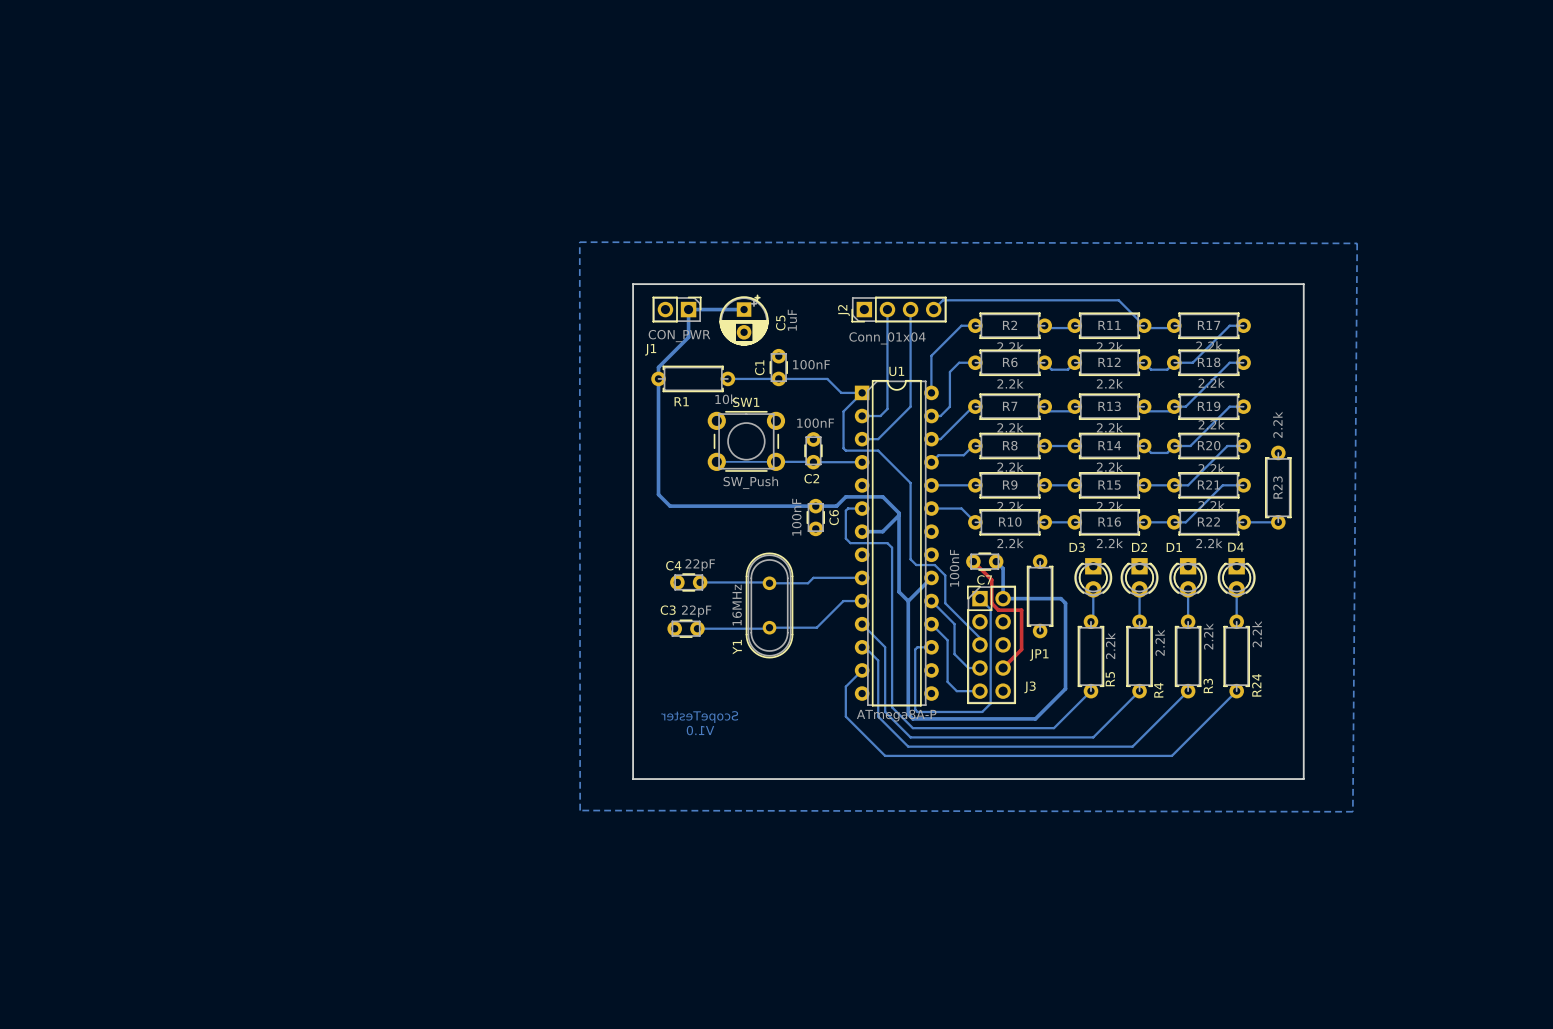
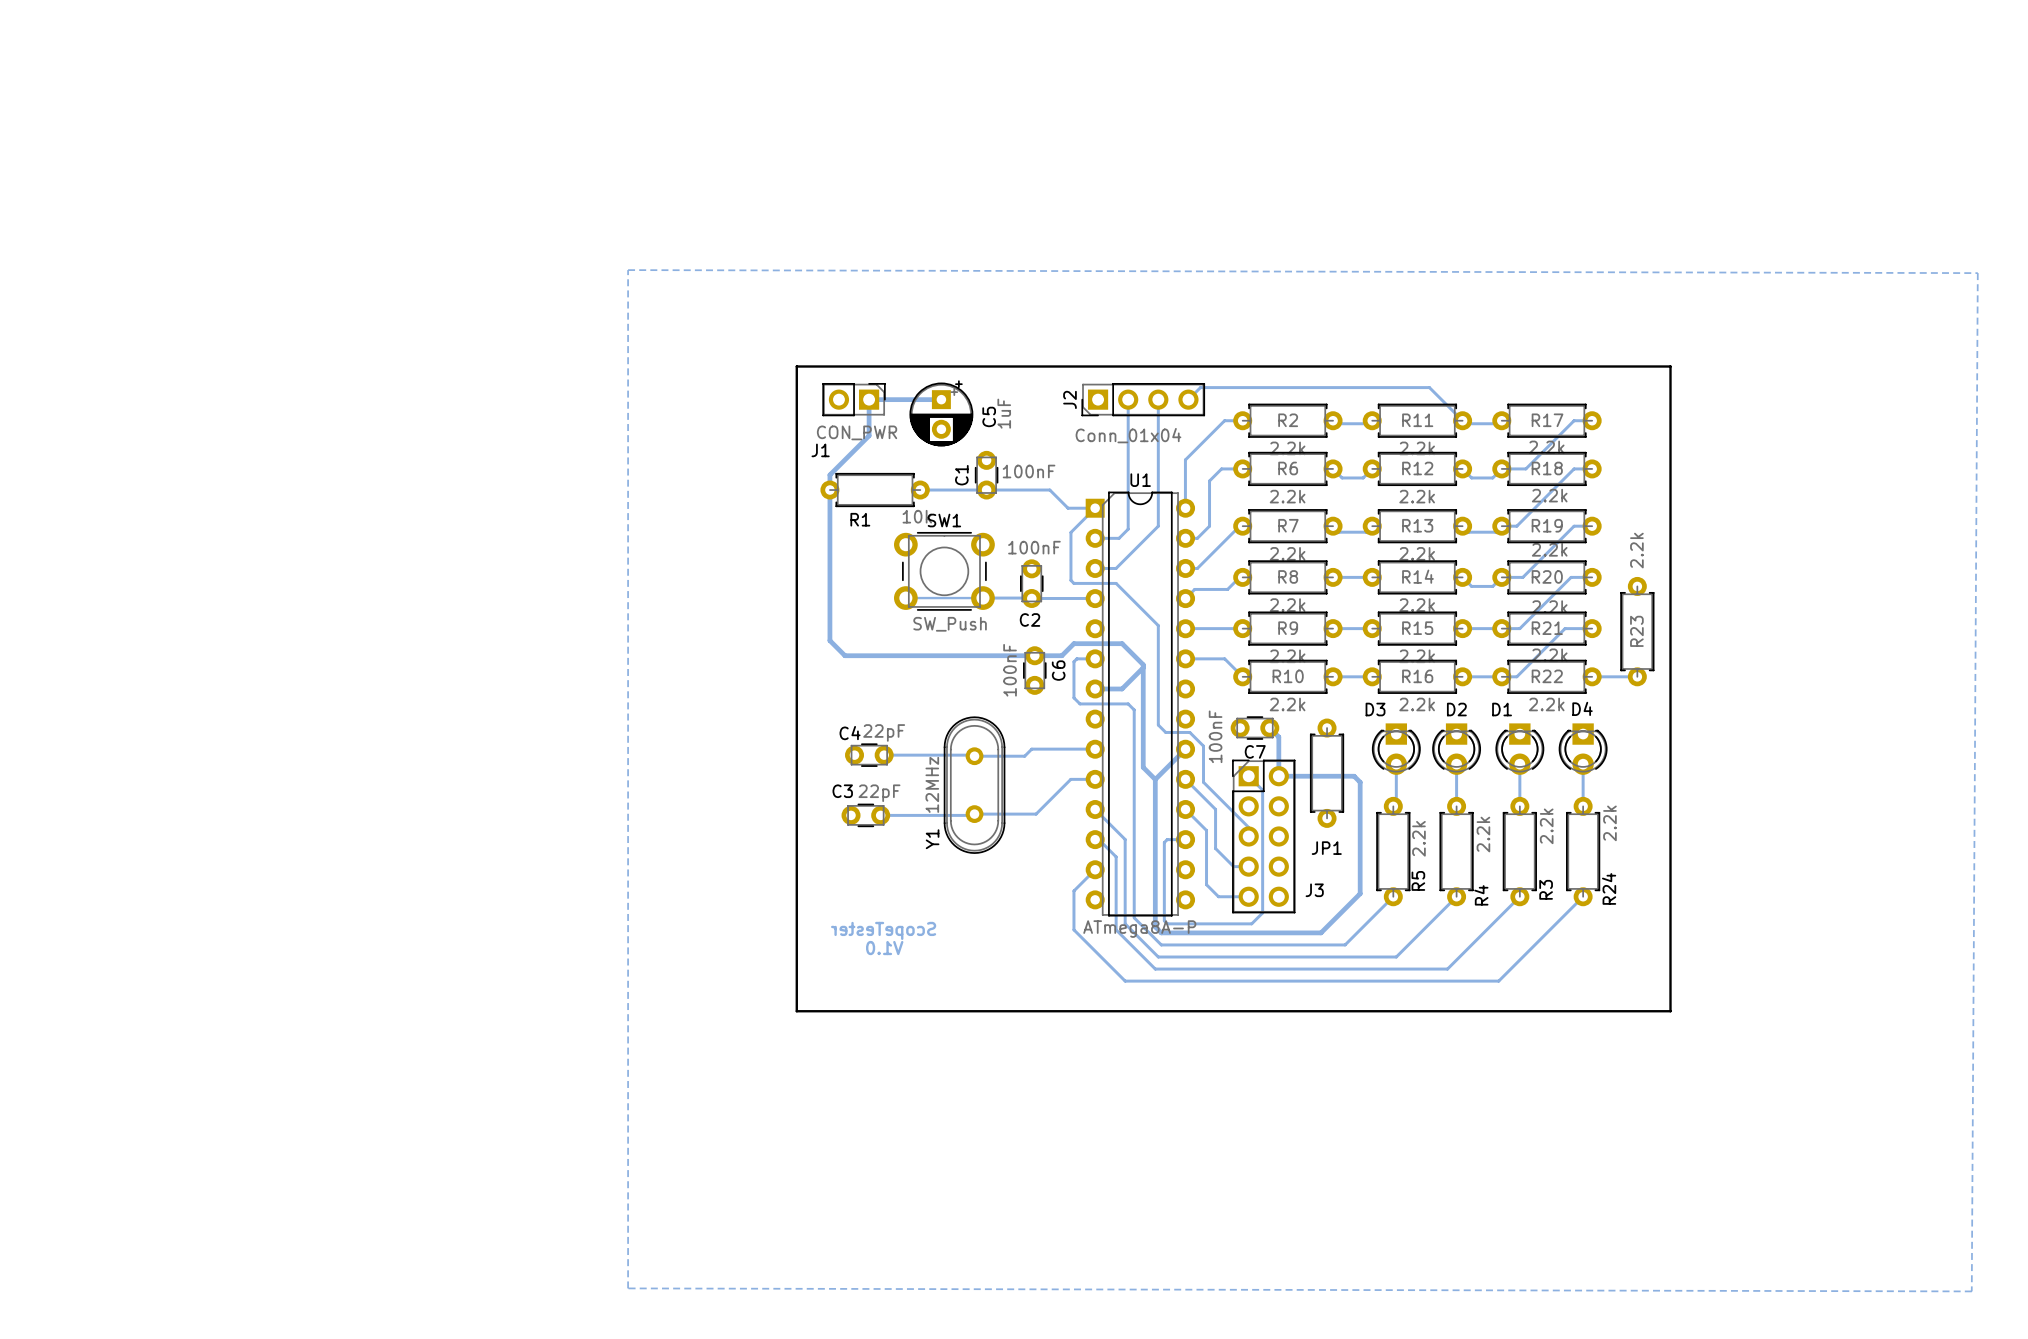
bottom zone outline: (579, 242) (580, 810) (1352, 811) (1357, 243) (579, 242) -> (628, 270) (628, 1288) (1971, 1291) (1977, 273) (628, 270)
top track: (973, 561) (991, 579) (991, 603) (998, 610) (1021, 610) (1021, 649) (1003, 668) -> none
Y1 value: 16MHz (737, 605) -> 12MHz (932, 784)

